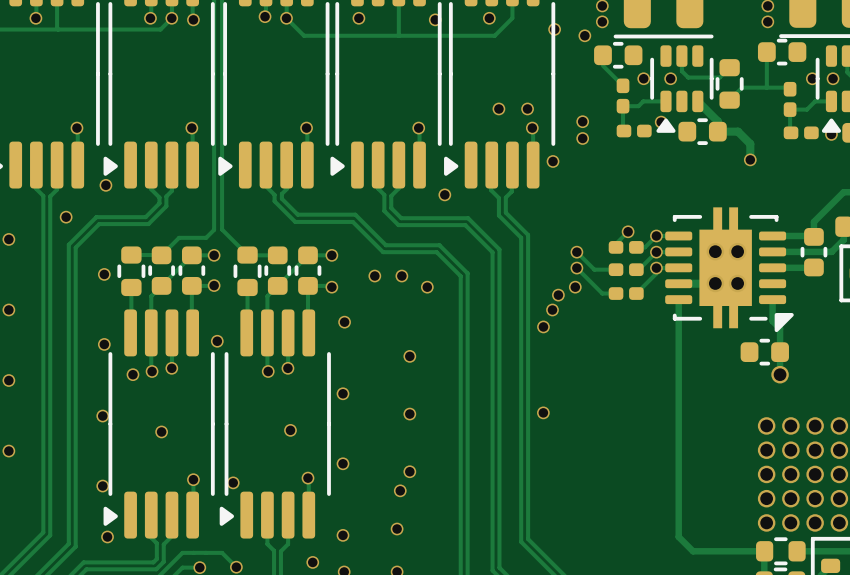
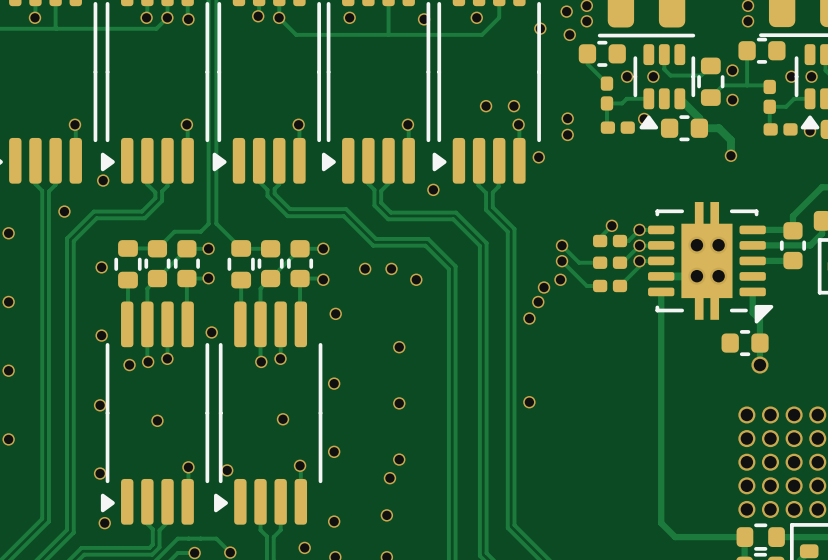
via: none -> (566, 11)
via: none -> (732, 70)
via: none -> (732, 99)

